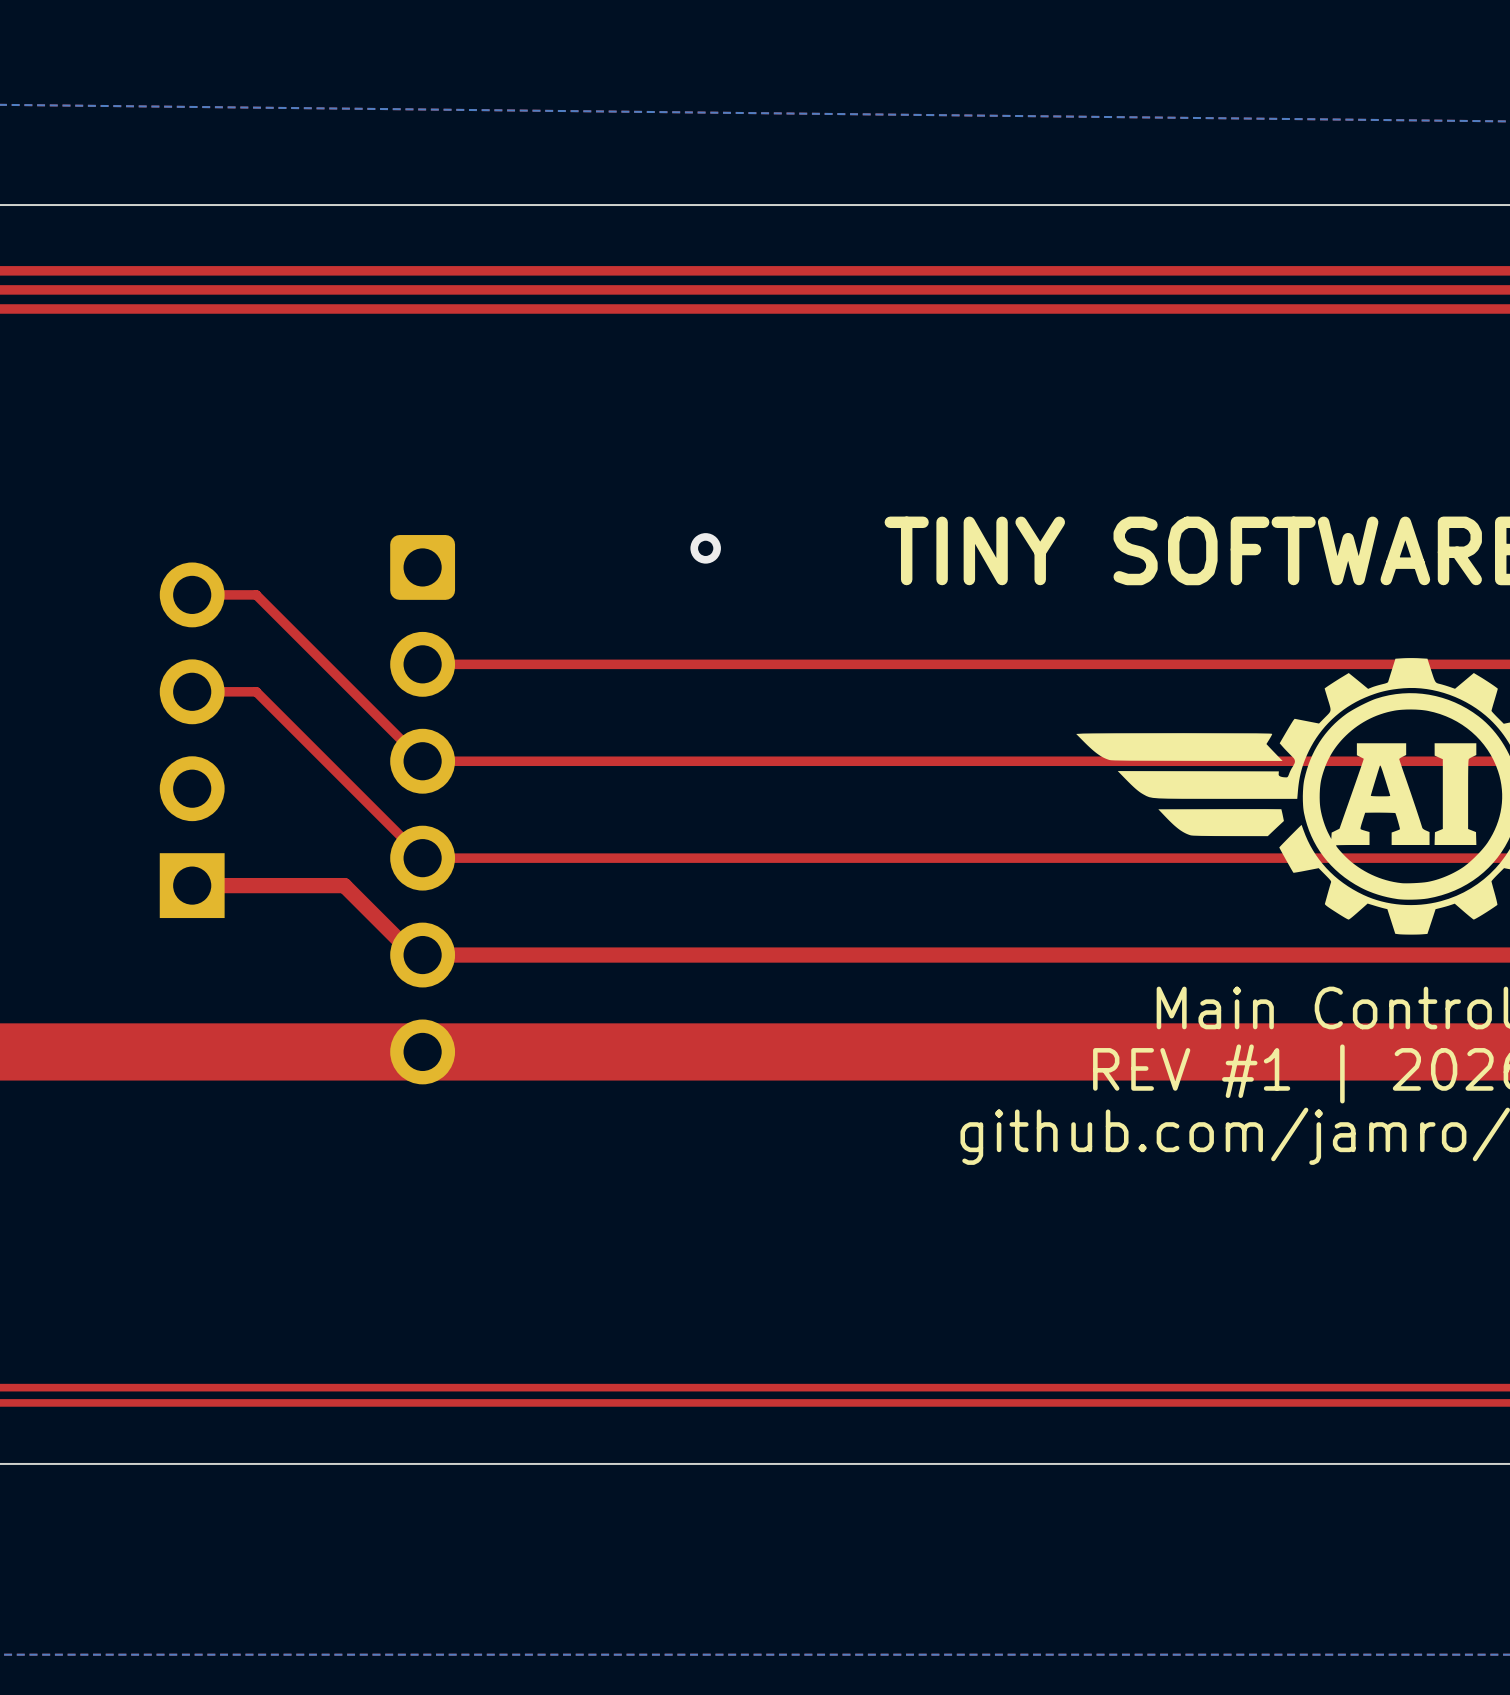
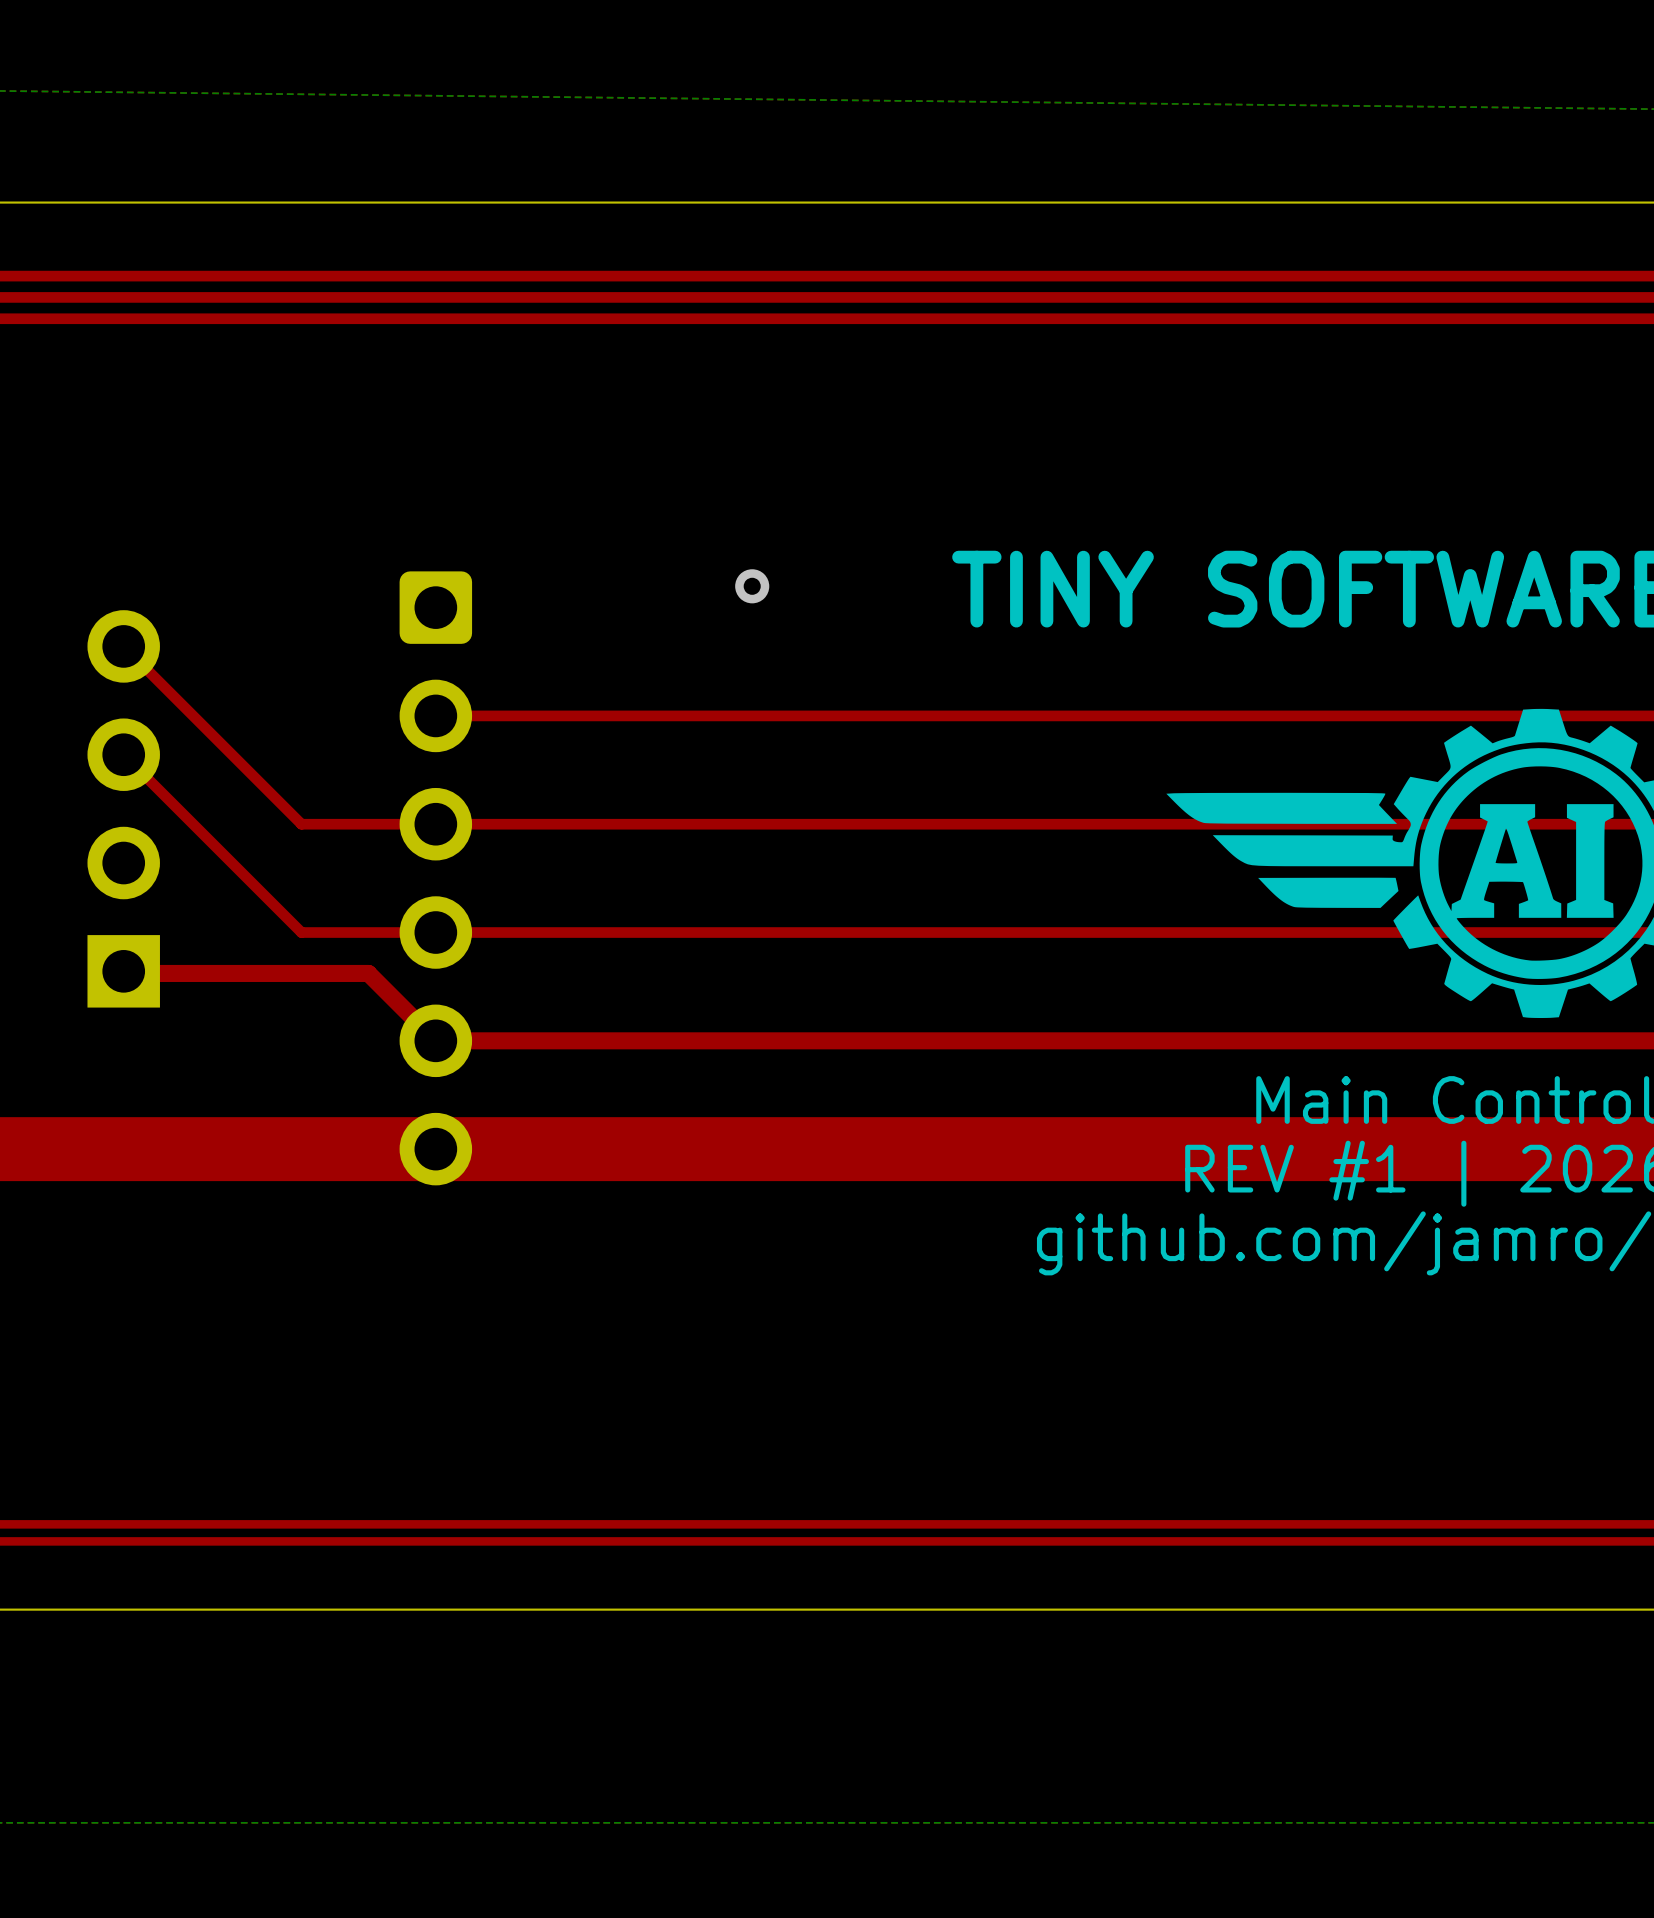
top track: (192, 594) (256, 594) (422, 761) -> (123, 646) (301, 824) (435, 824)
top track: (192, 691) (256, 691) (422, 858) -> (123, 754) (301, 932) (435, 932)
part position: (192, 740) -> (123, 808)
top track: (192, 885) (344, 885) (413, 955) (422, 955) -> (123, 971) (125, 973) (368, 973) (435, 1040)

